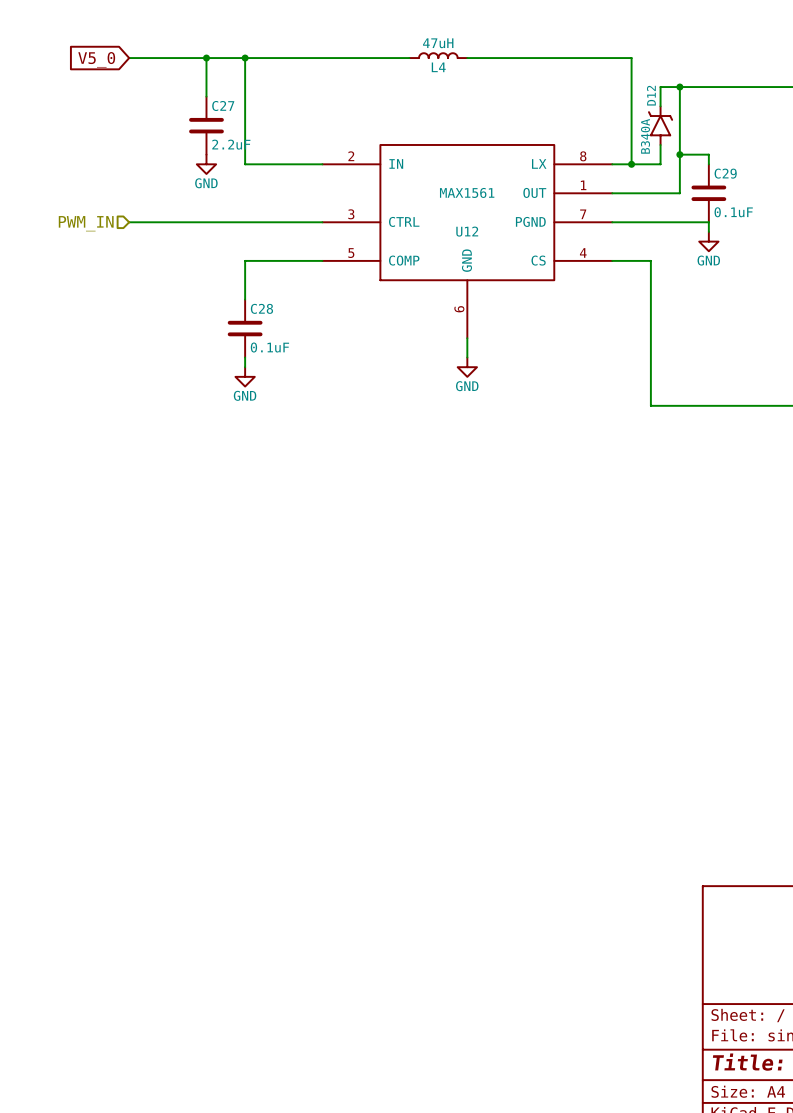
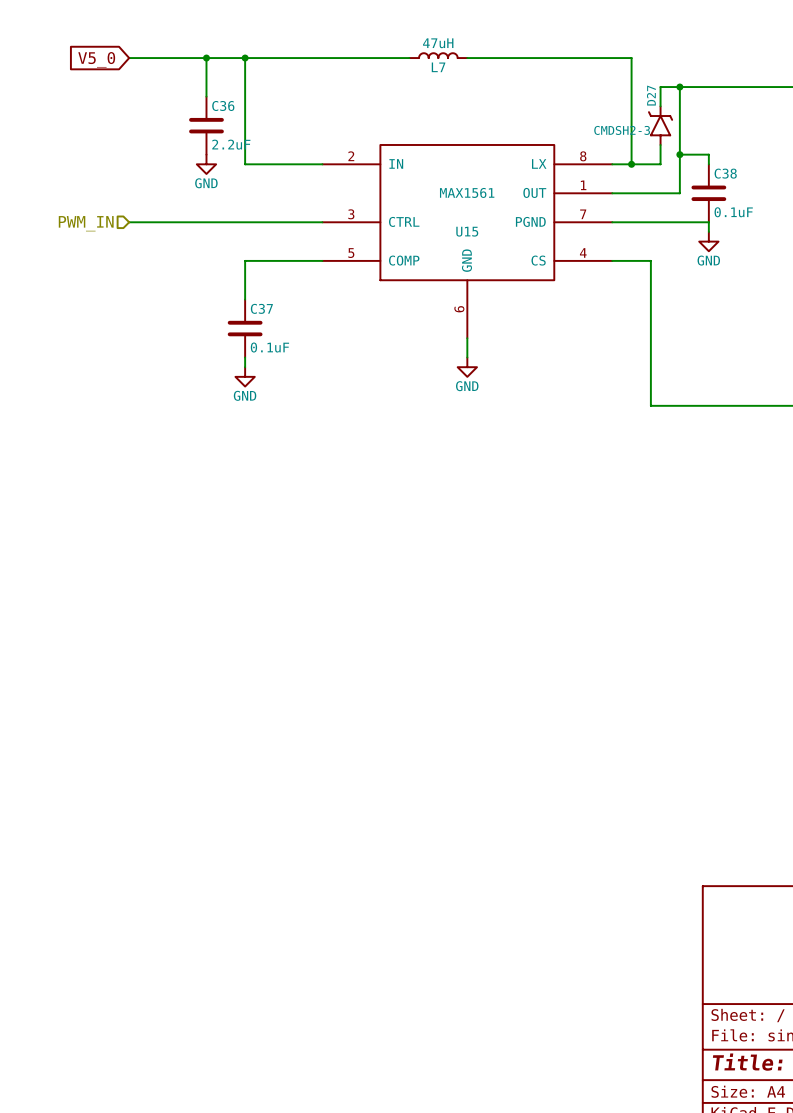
L4 name: L4 (438, 67) -> L7 (438, 67)
D12 name: D12 (651, 95) -> D27 (651, 95)
C27 name: C27 (223, 105) -> C36 (223, 105)
D12 value: B340A (645, 136) -> CMDSH2-3 (622, 130)
C29 name: C29 (725, 173) -> C38 (725, 173)
U12 name: U12 (467, 231) -> U15 (467, 231)
C28 name: C28 (261, 308) -> C37 (261, 308)

